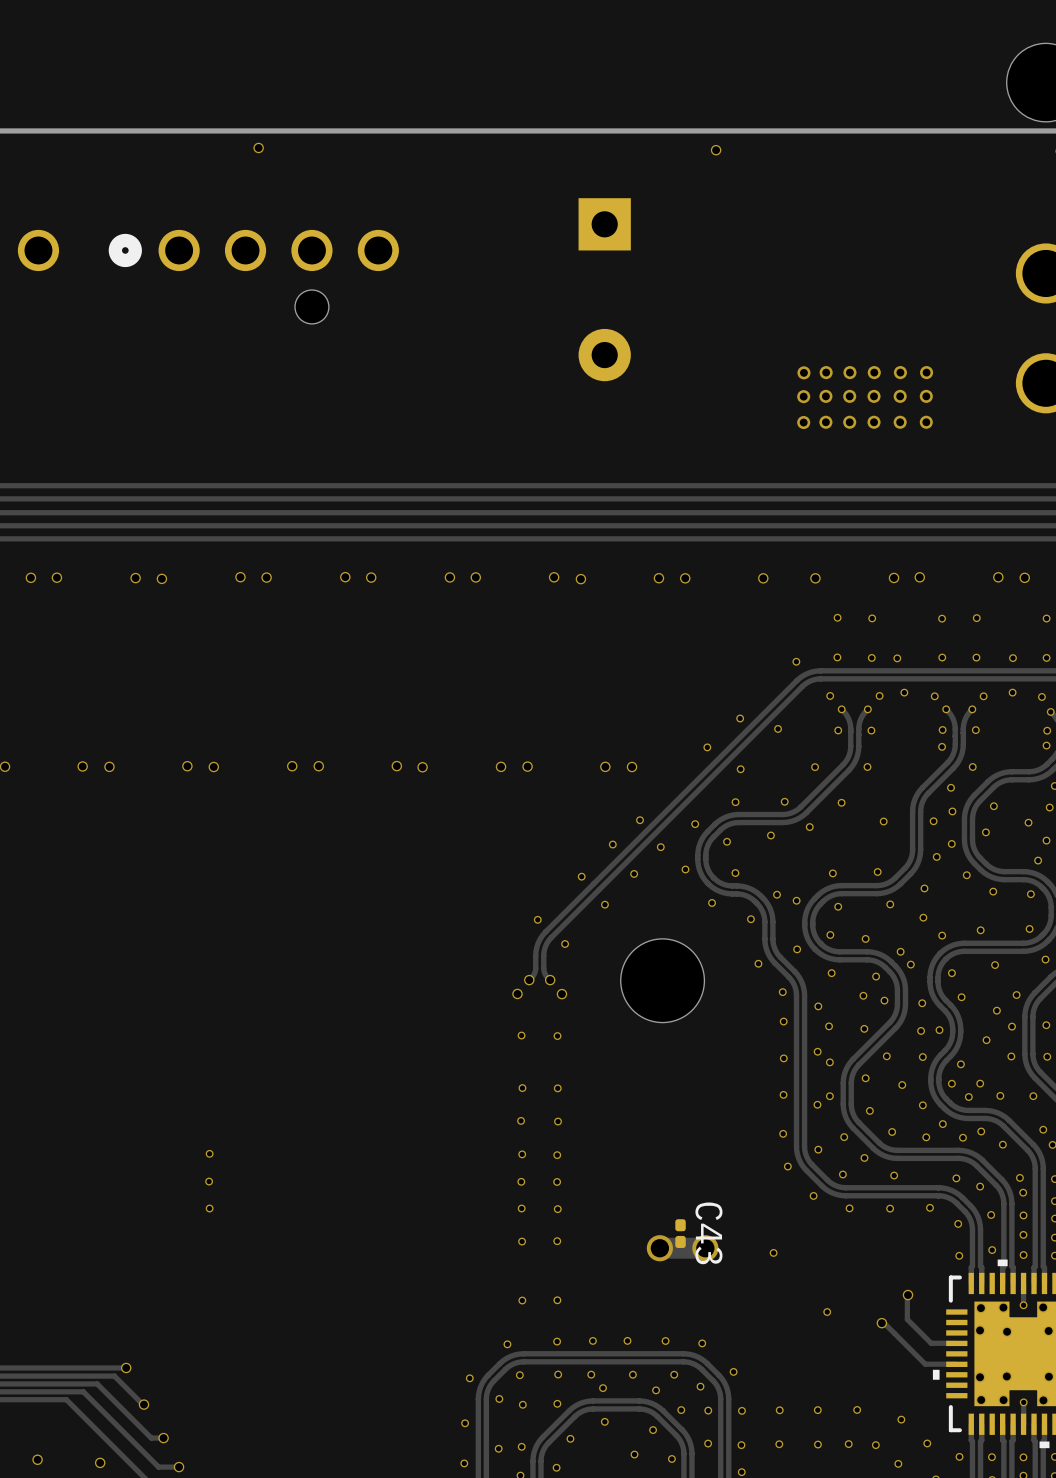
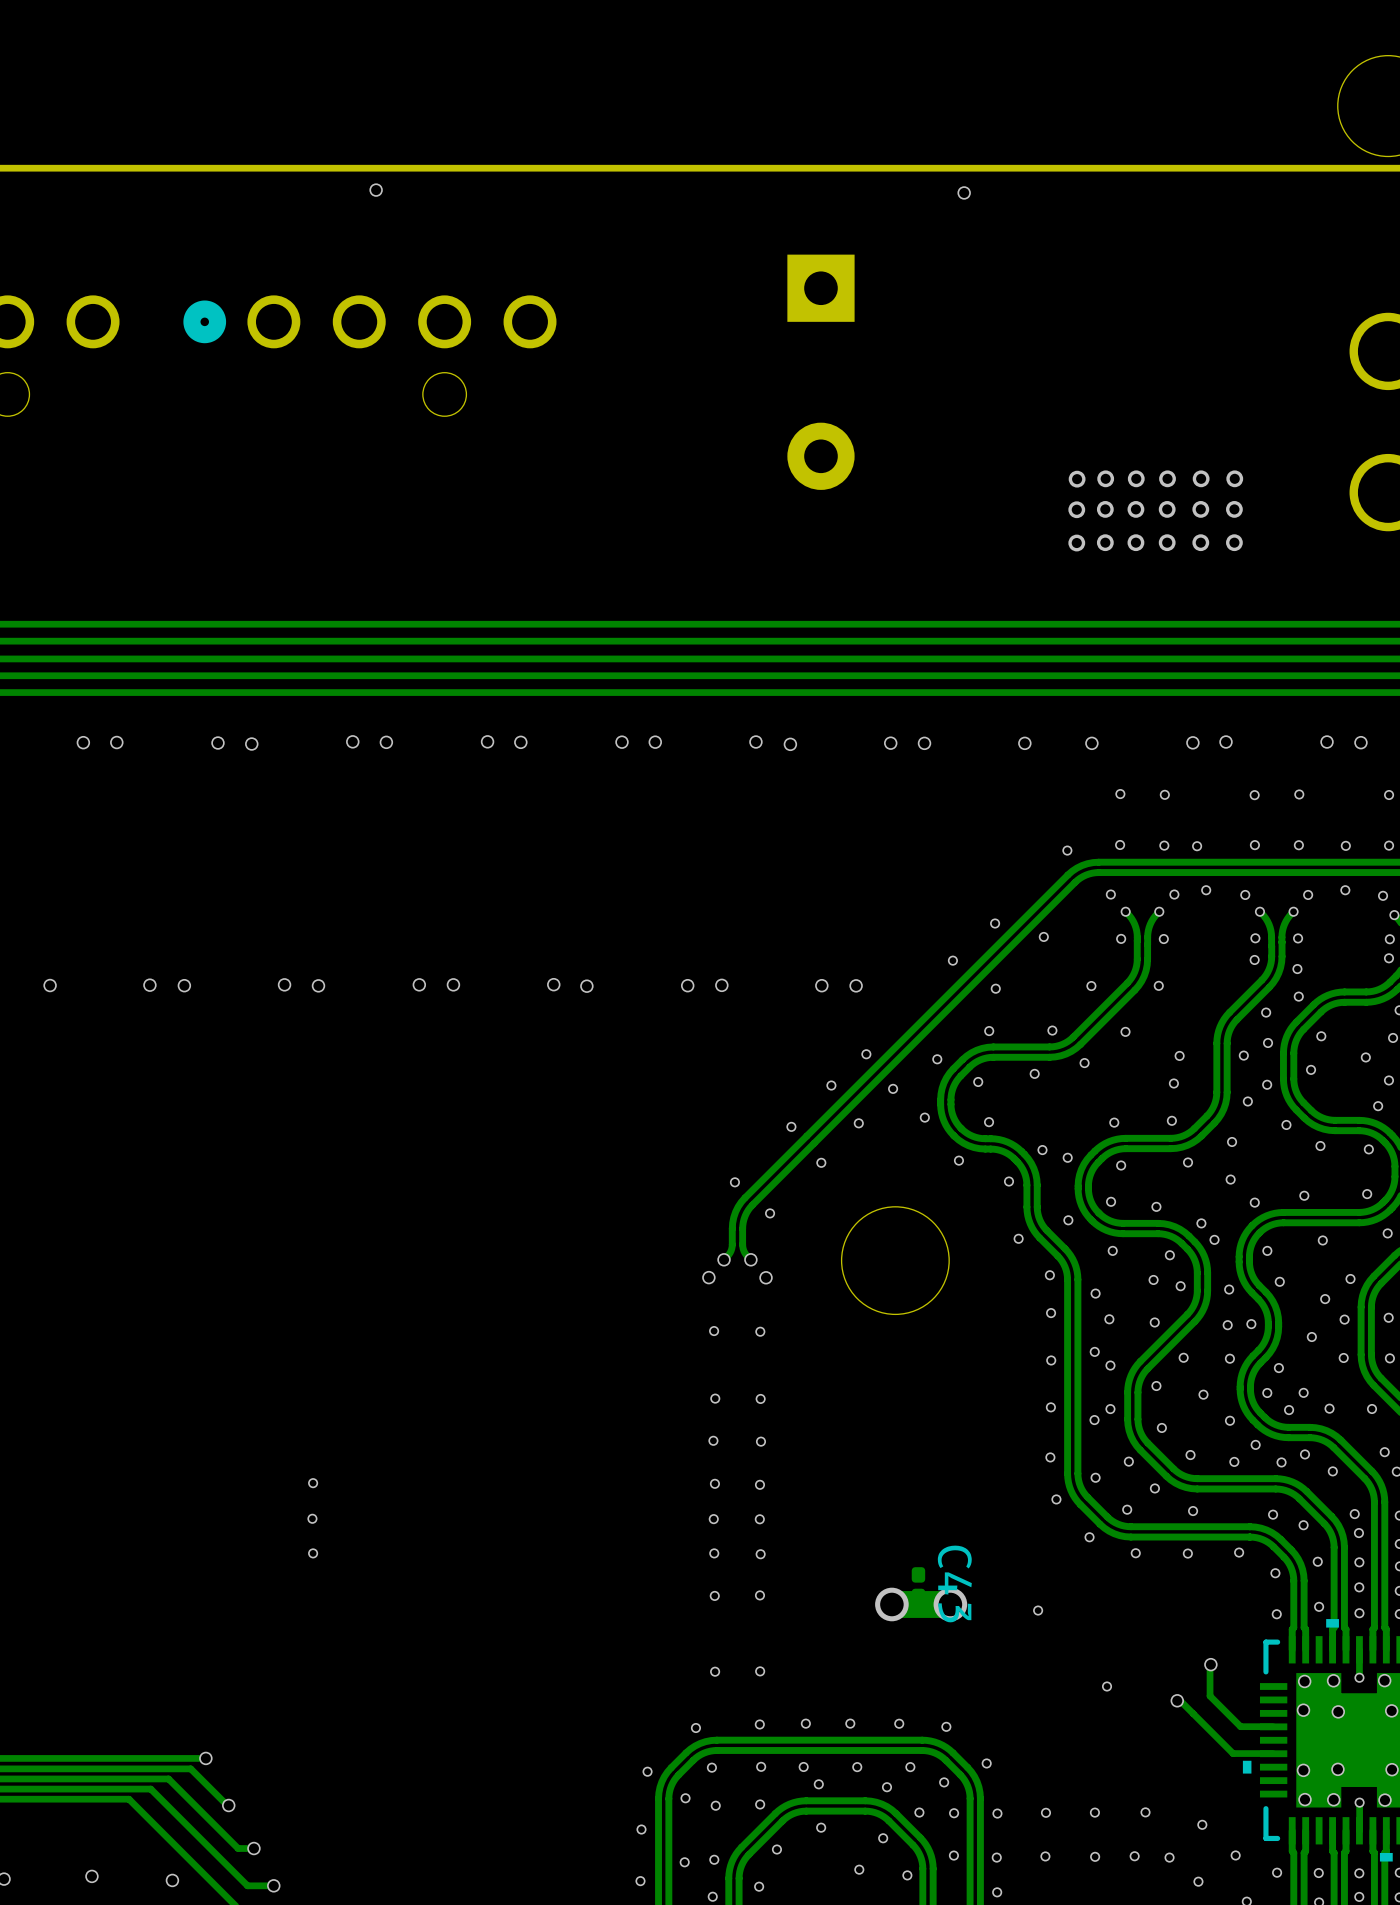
via: none -> (1297, 969)
via: (972, 767) -> none
via: none -> (1298, 996)
via: none -> (1173, 1083)

